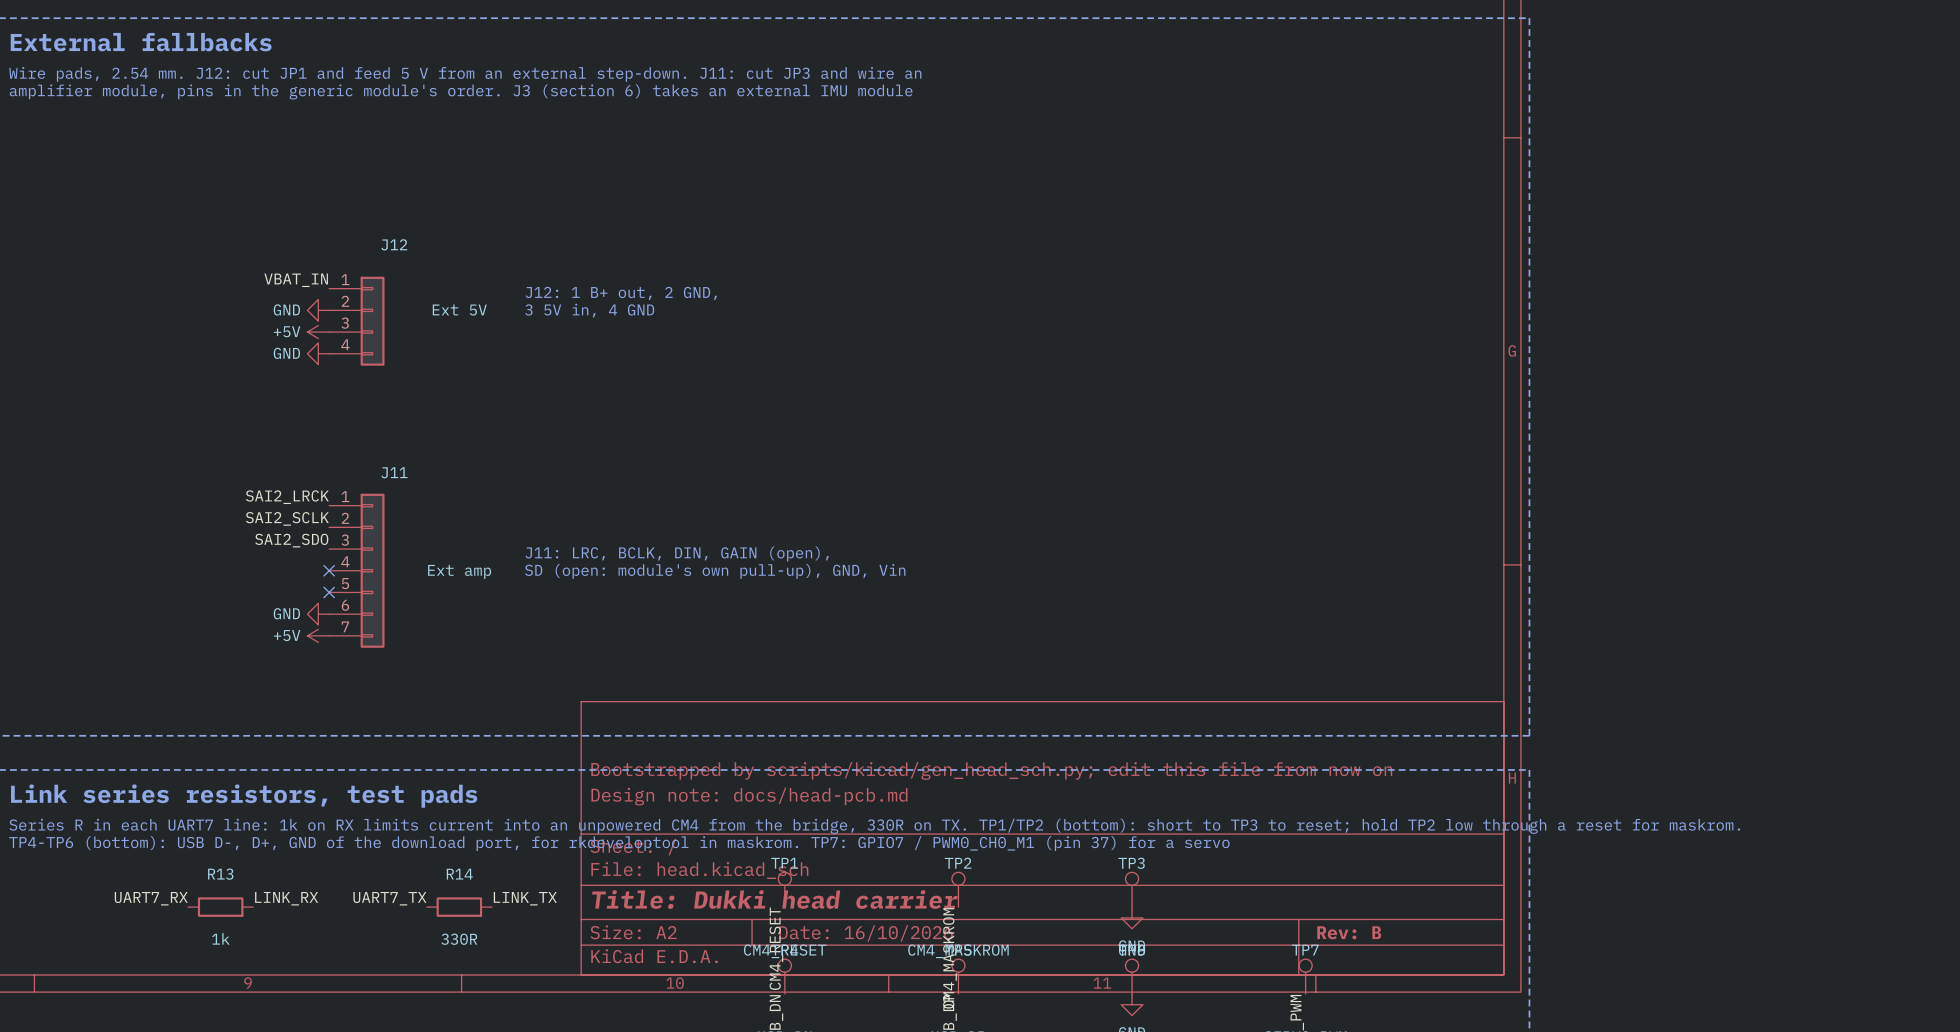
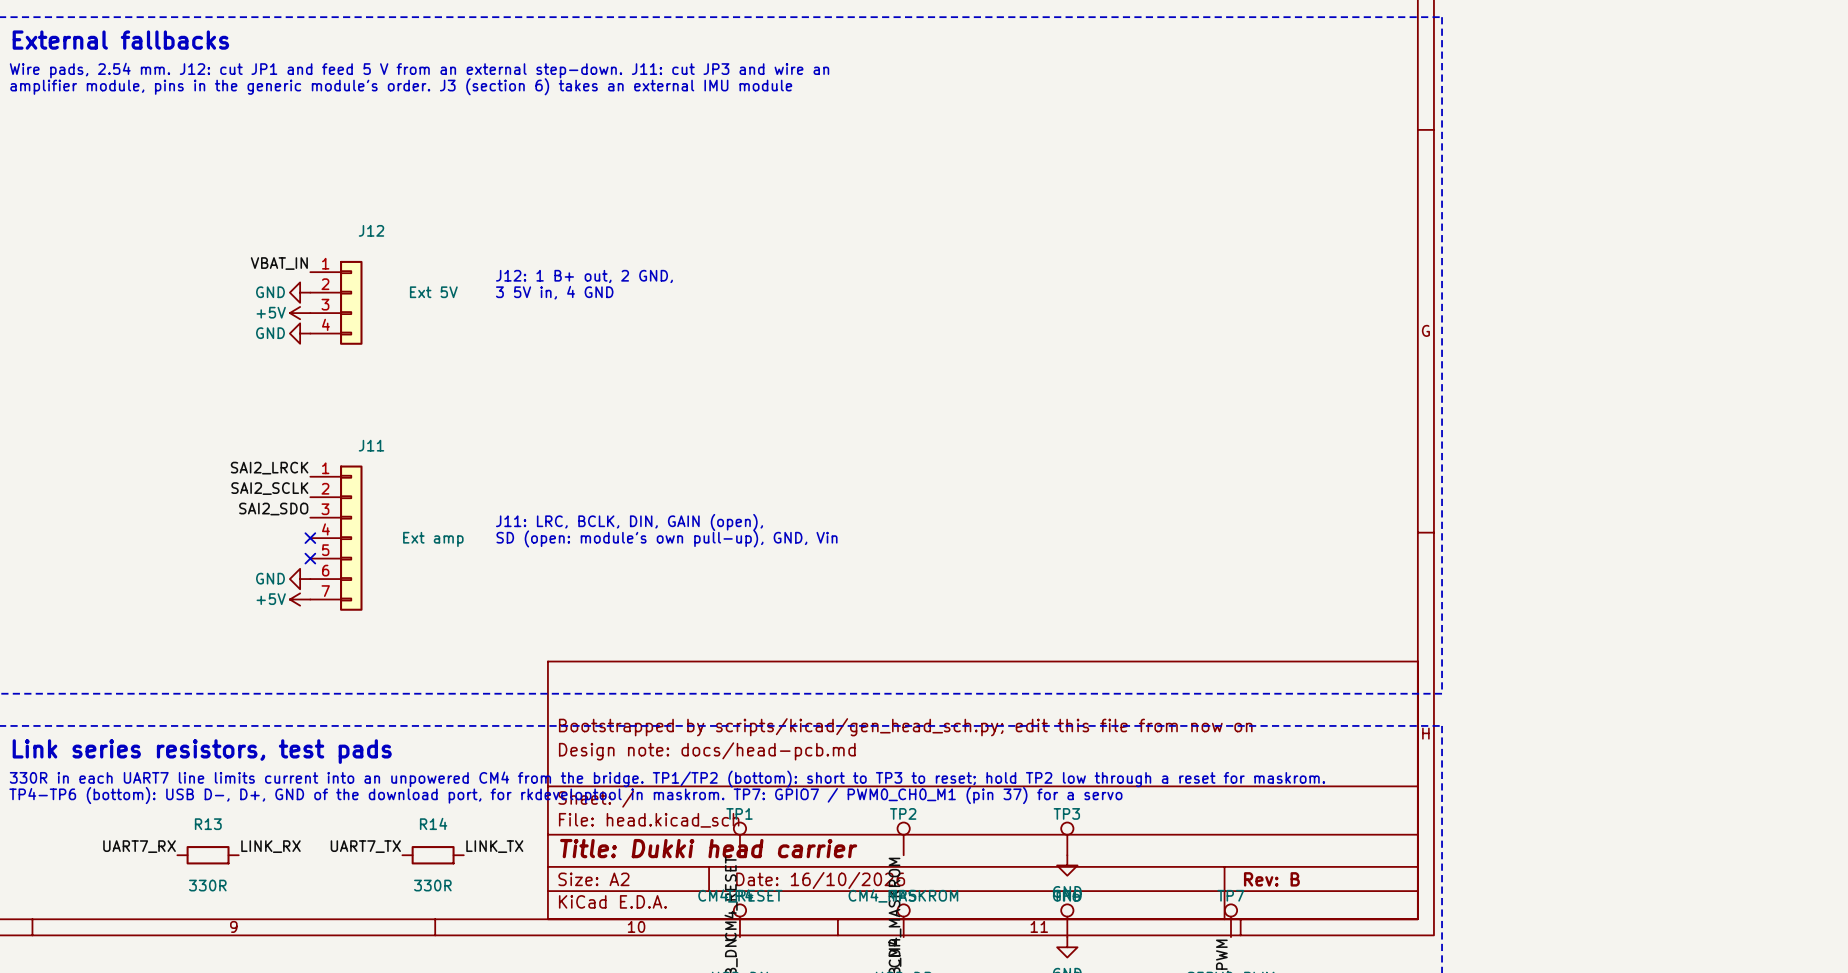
text: Series R in each UART7 line: 1k on RX limits current into an unpowered CM4 from the bridge, 330R on TX. TP1/TP2 (bottom): short to TP3 to reset; hold TP2 low through a reset for maskrom. (874, 826) -> 330R in each UART7 line limits current into an unpowered CM4 from the bridge. TP1/TP2 (bottom): short to TP3 to reset; hold TP2 low through a reset for maskrom. (667, 779)
R13 value: 1k (220, 938) -> 330R (207, 885)

